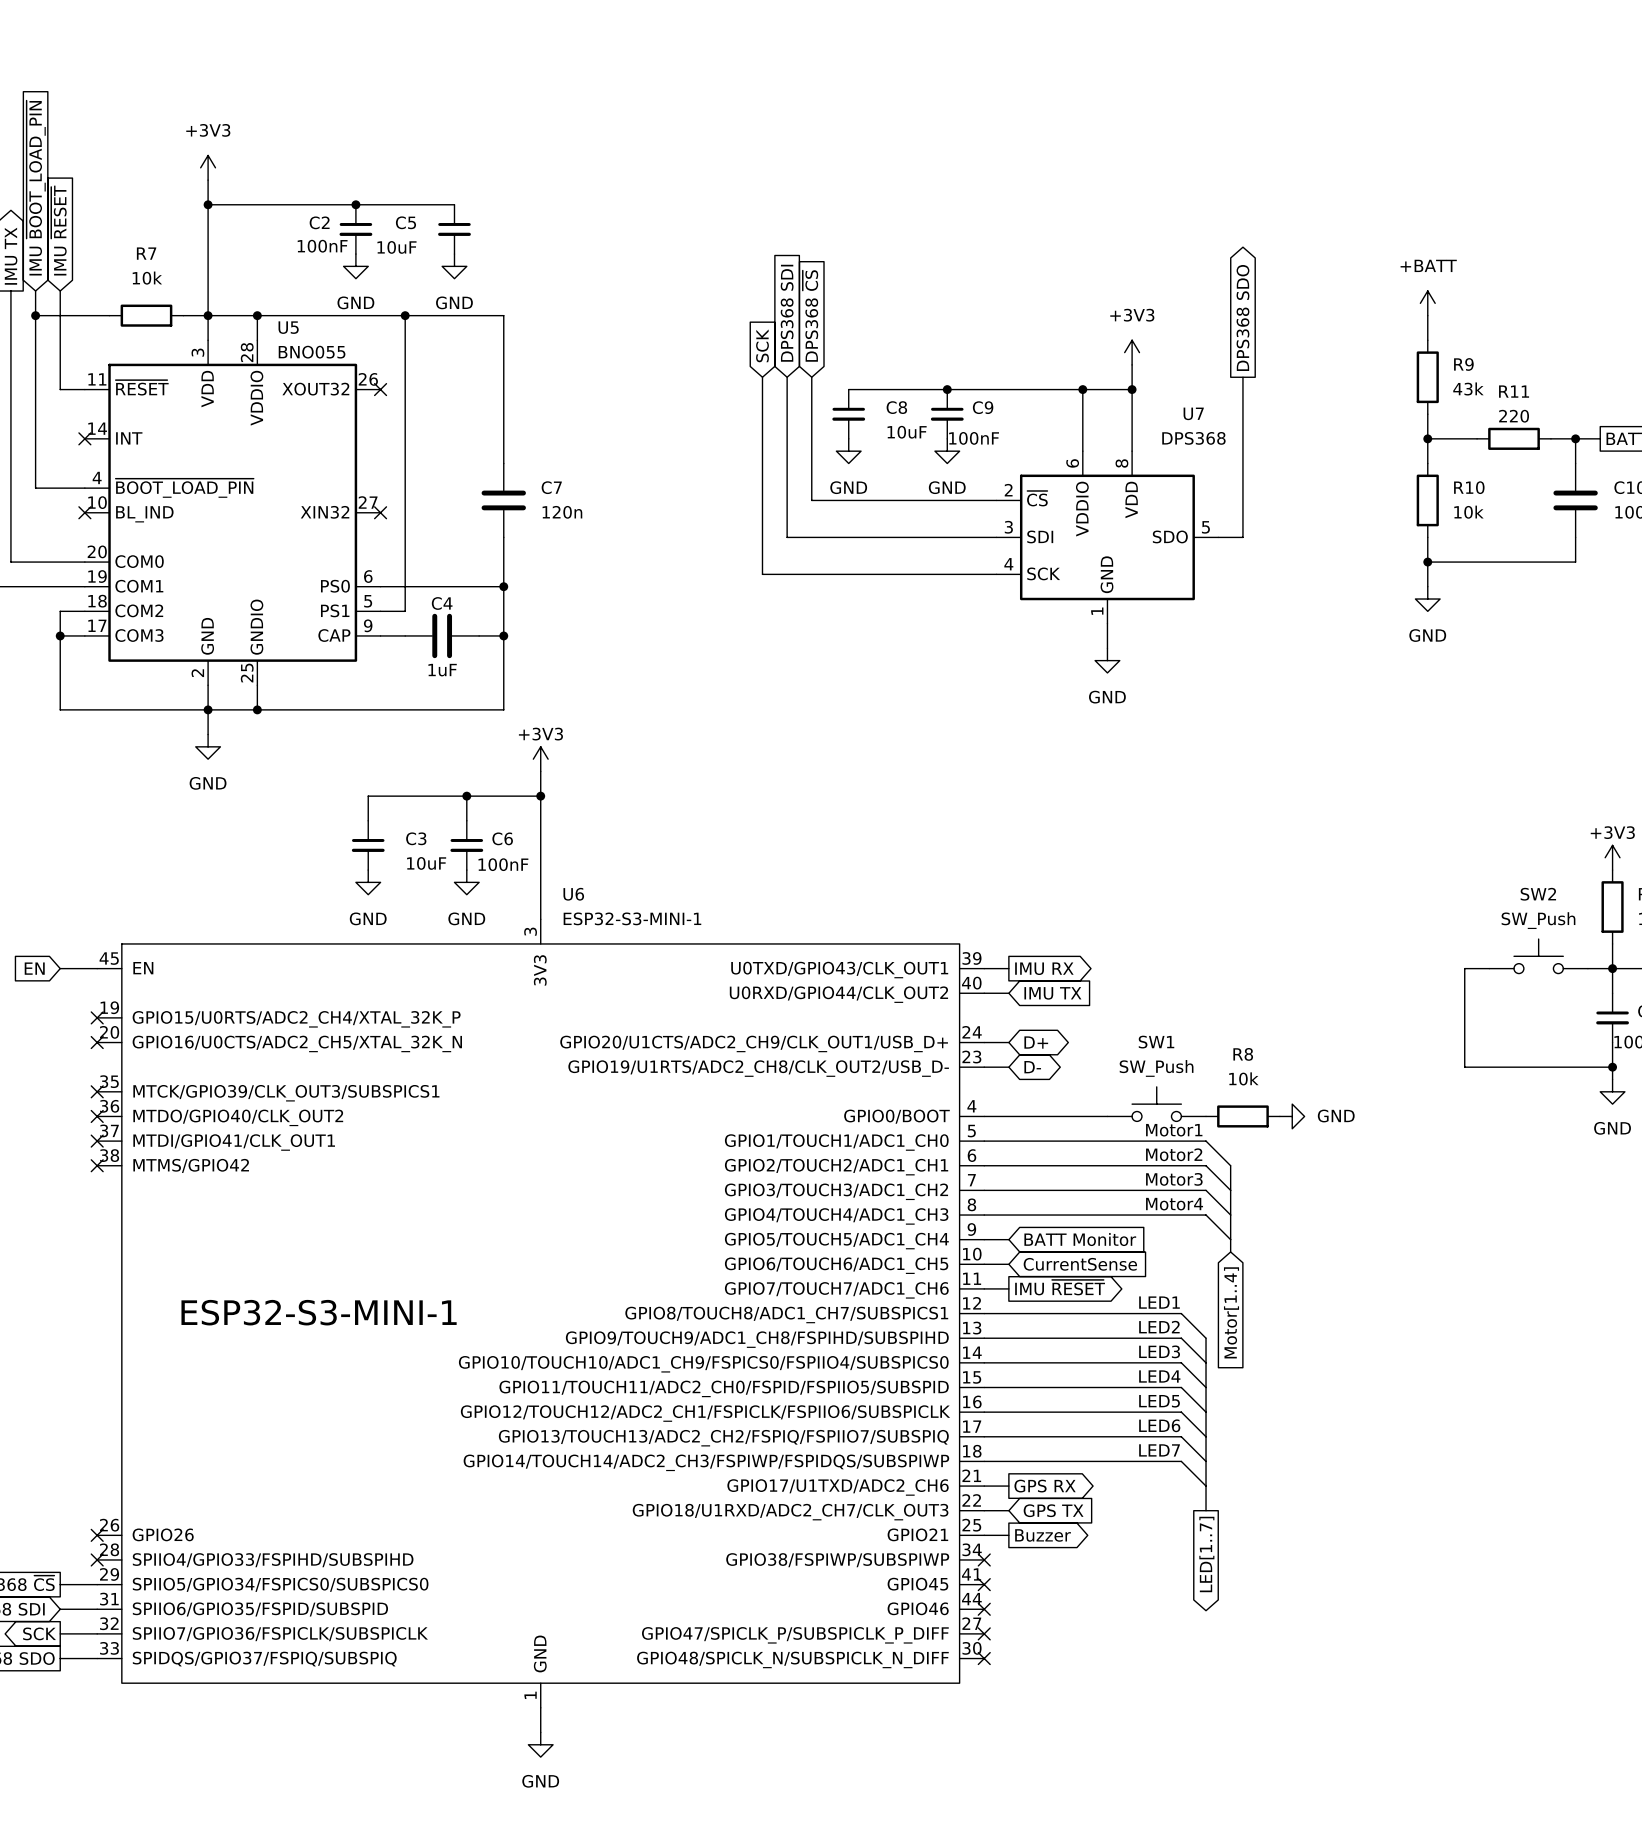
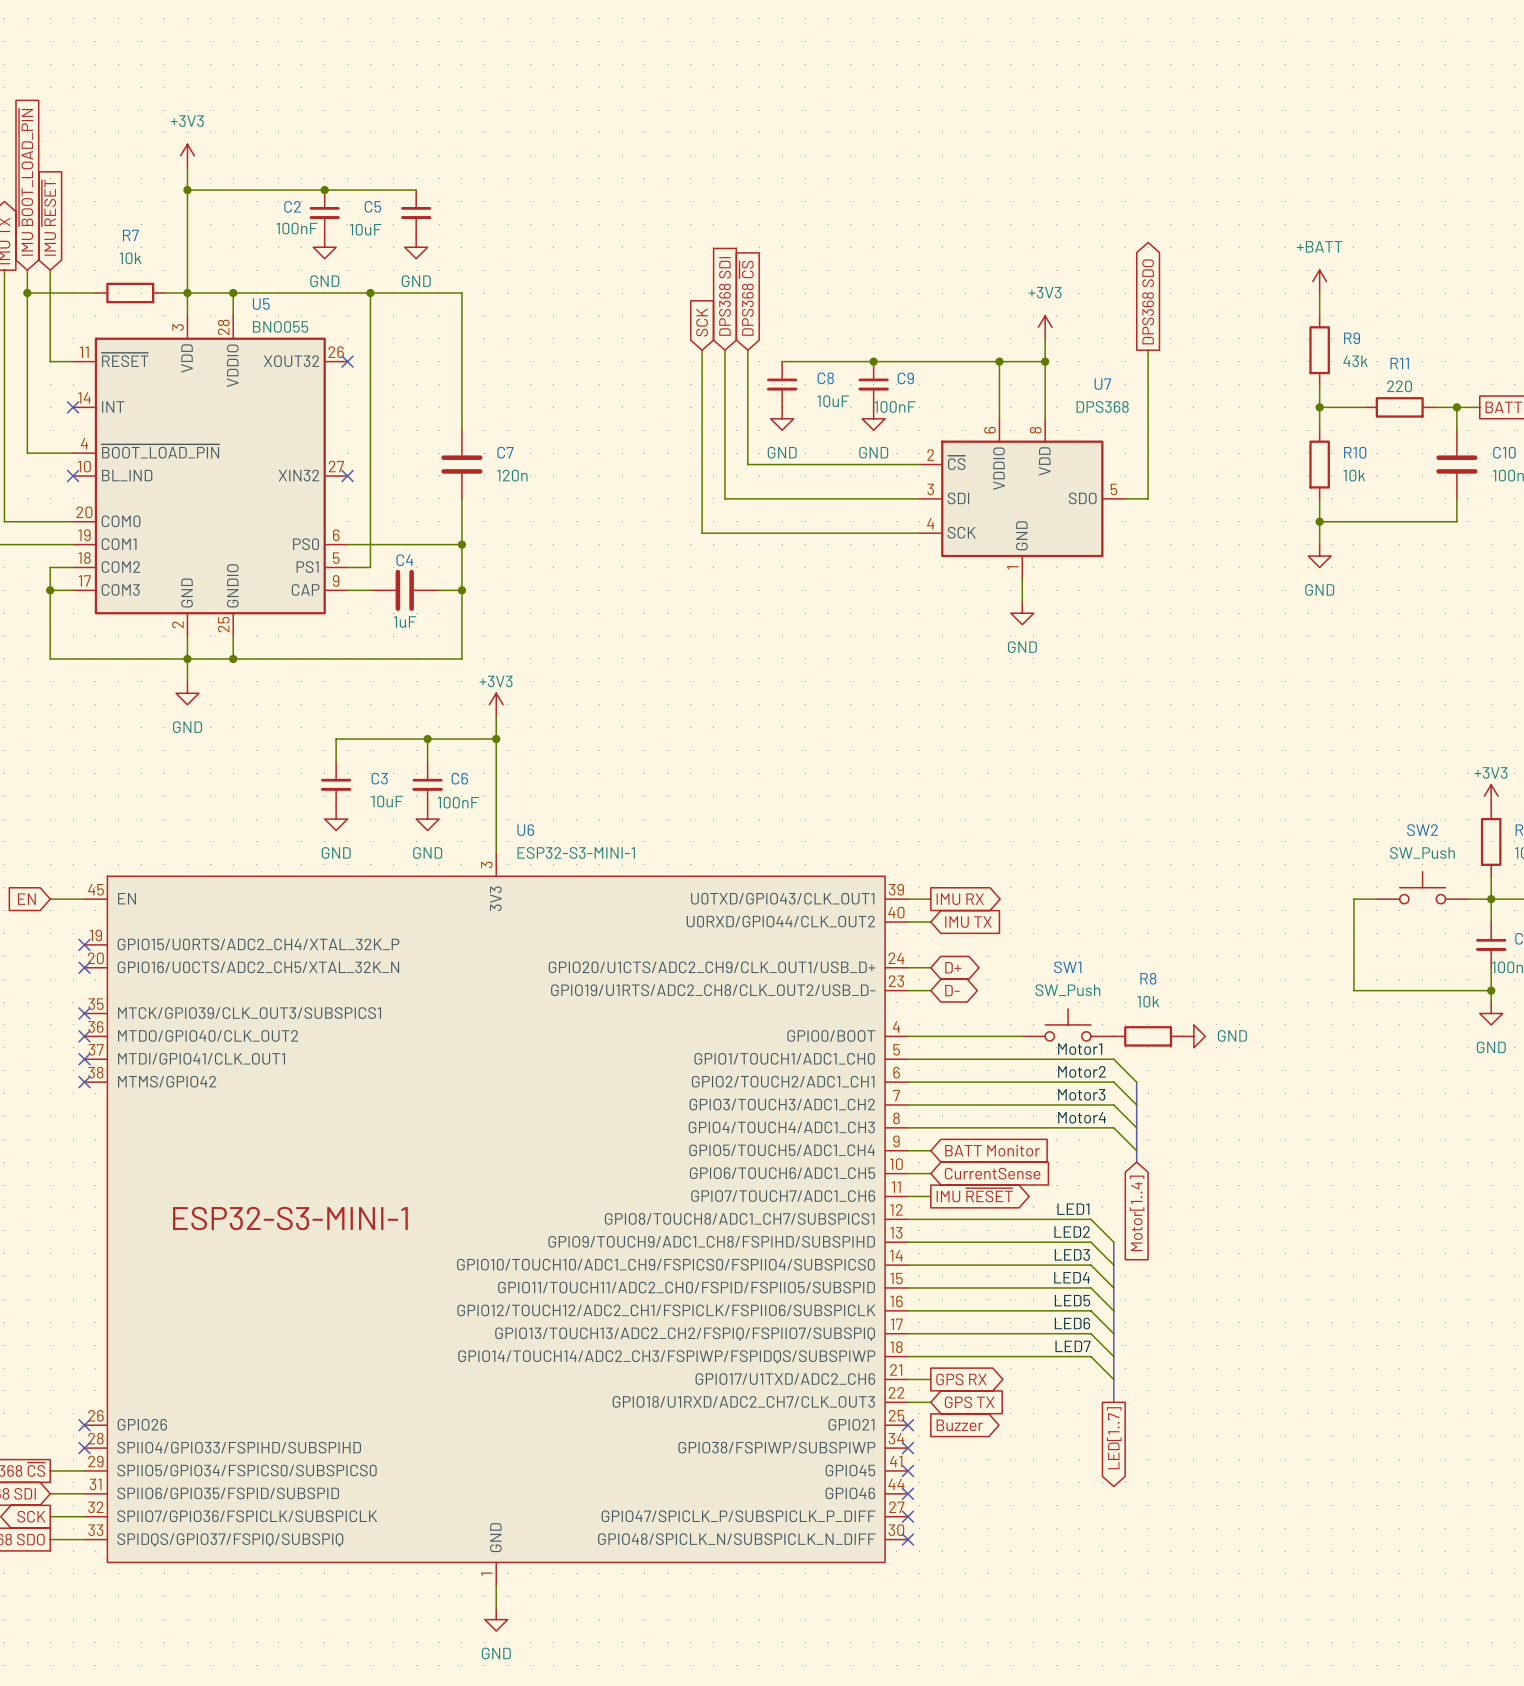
wire: (984, 1535) (1008, 1535) -> none
no-connect mark: none -> (907, 1425)

